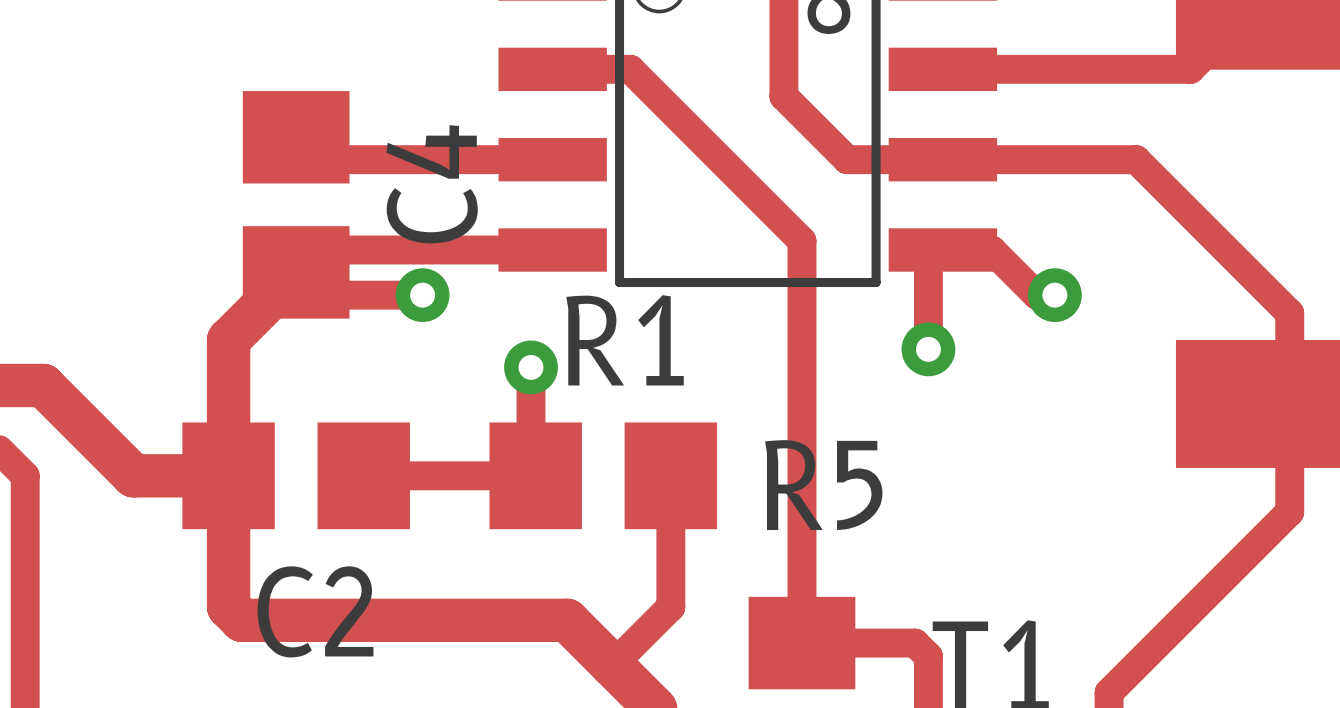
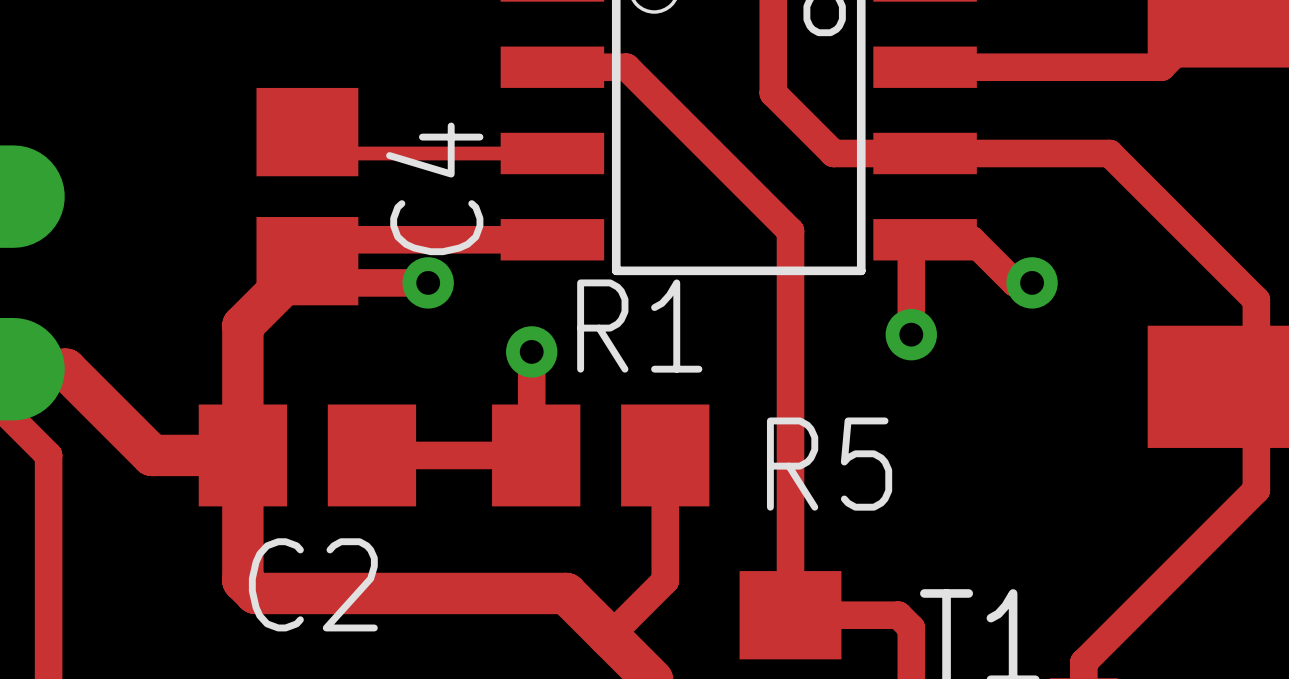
track width: thick (318, 159) (552, 159) -> thin (328, 153) (552, 153)

